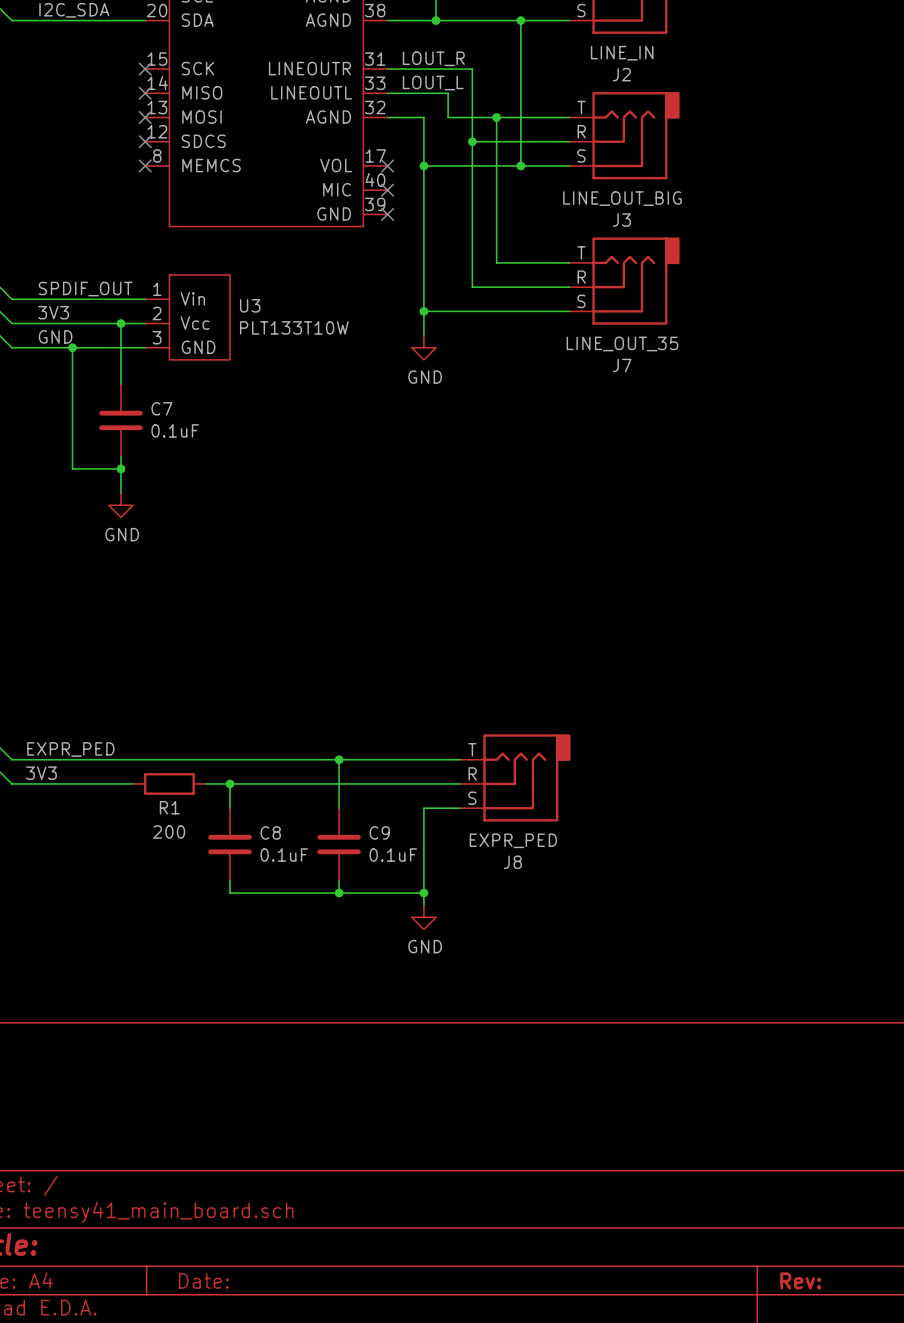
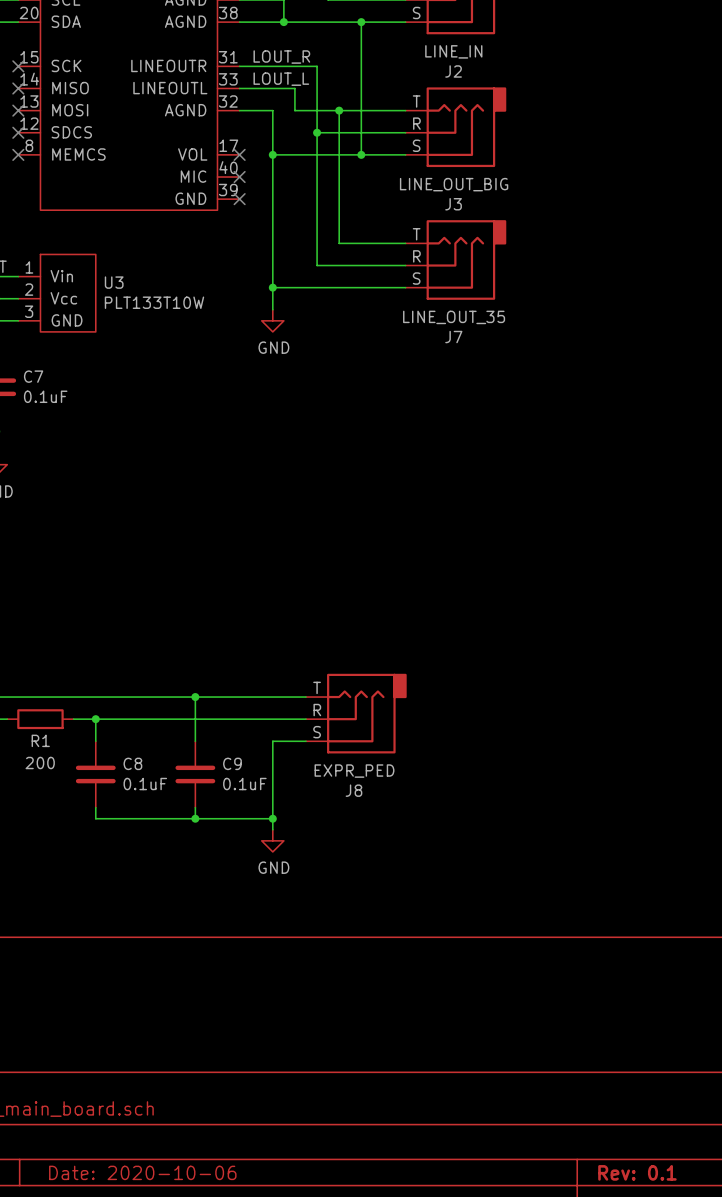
title block: Date: (203, 1280) -> Date: 2020-10-06 (142, 1172)
title block: Rev: (800, 1280) -> Rev: 0.1 (637, 1172)

